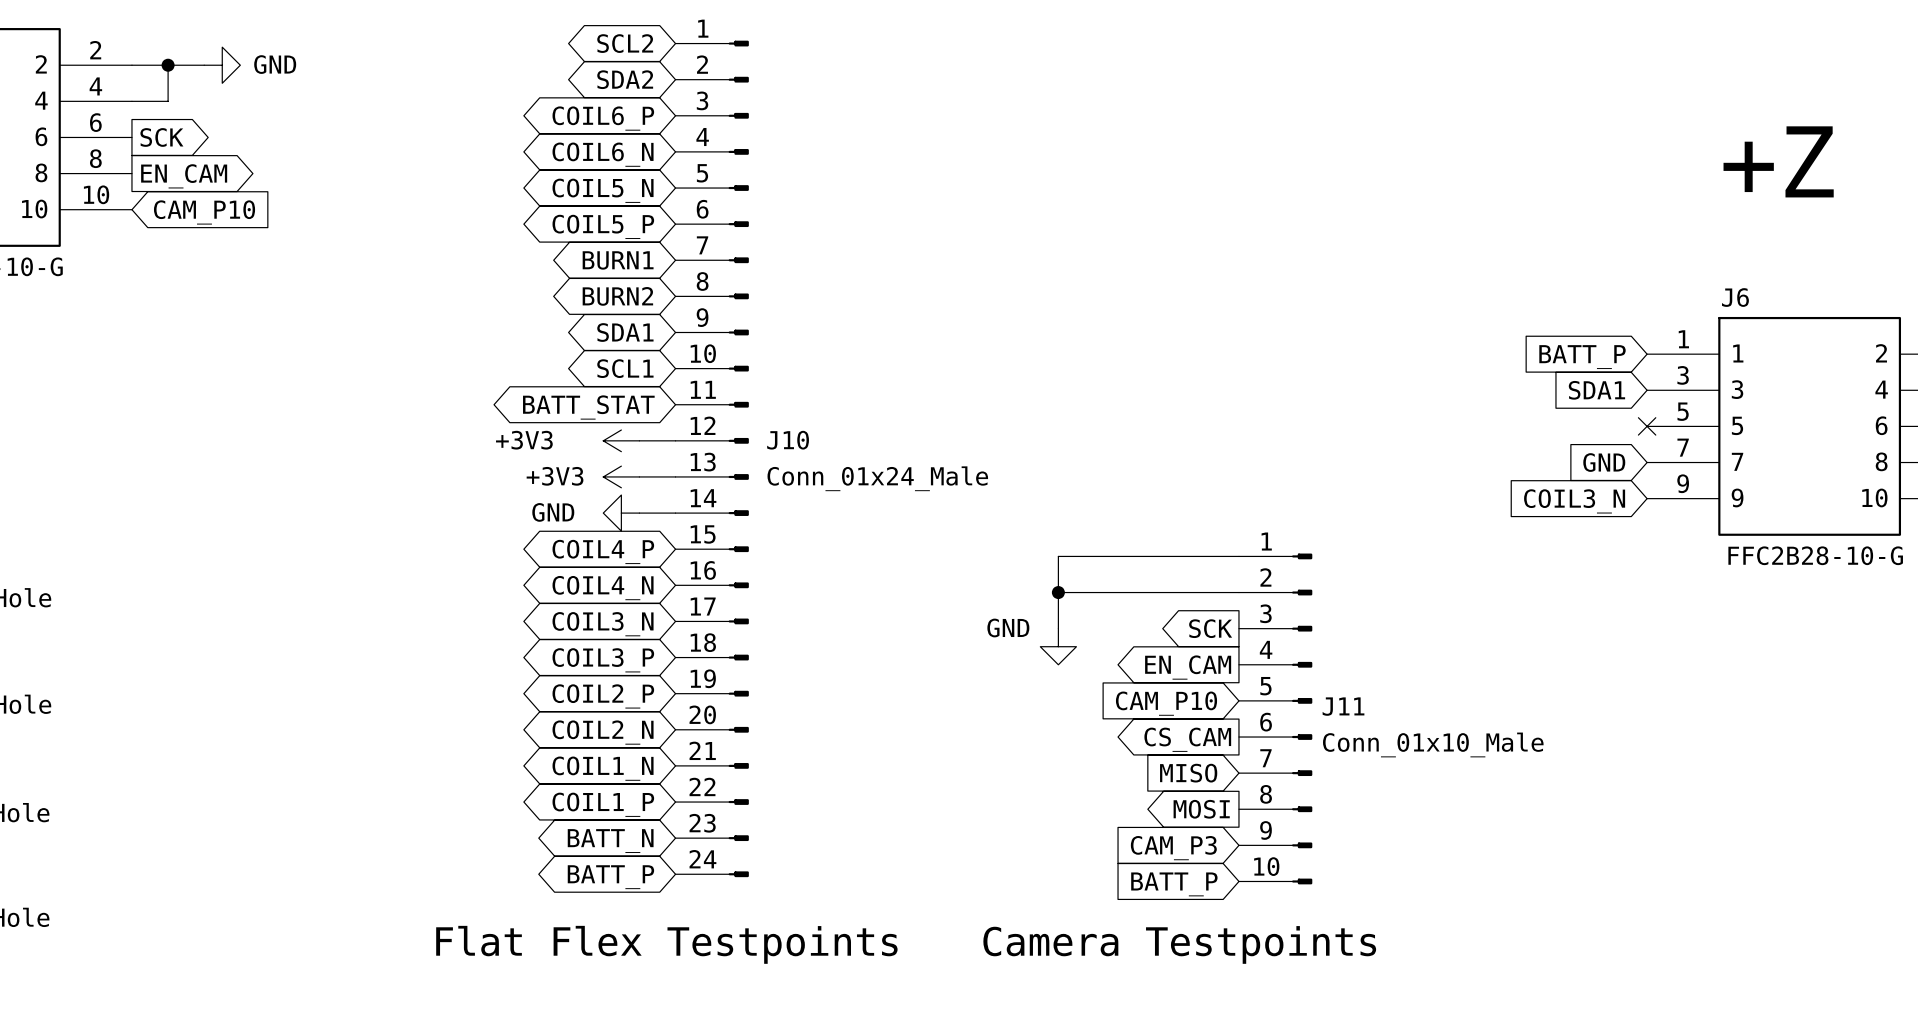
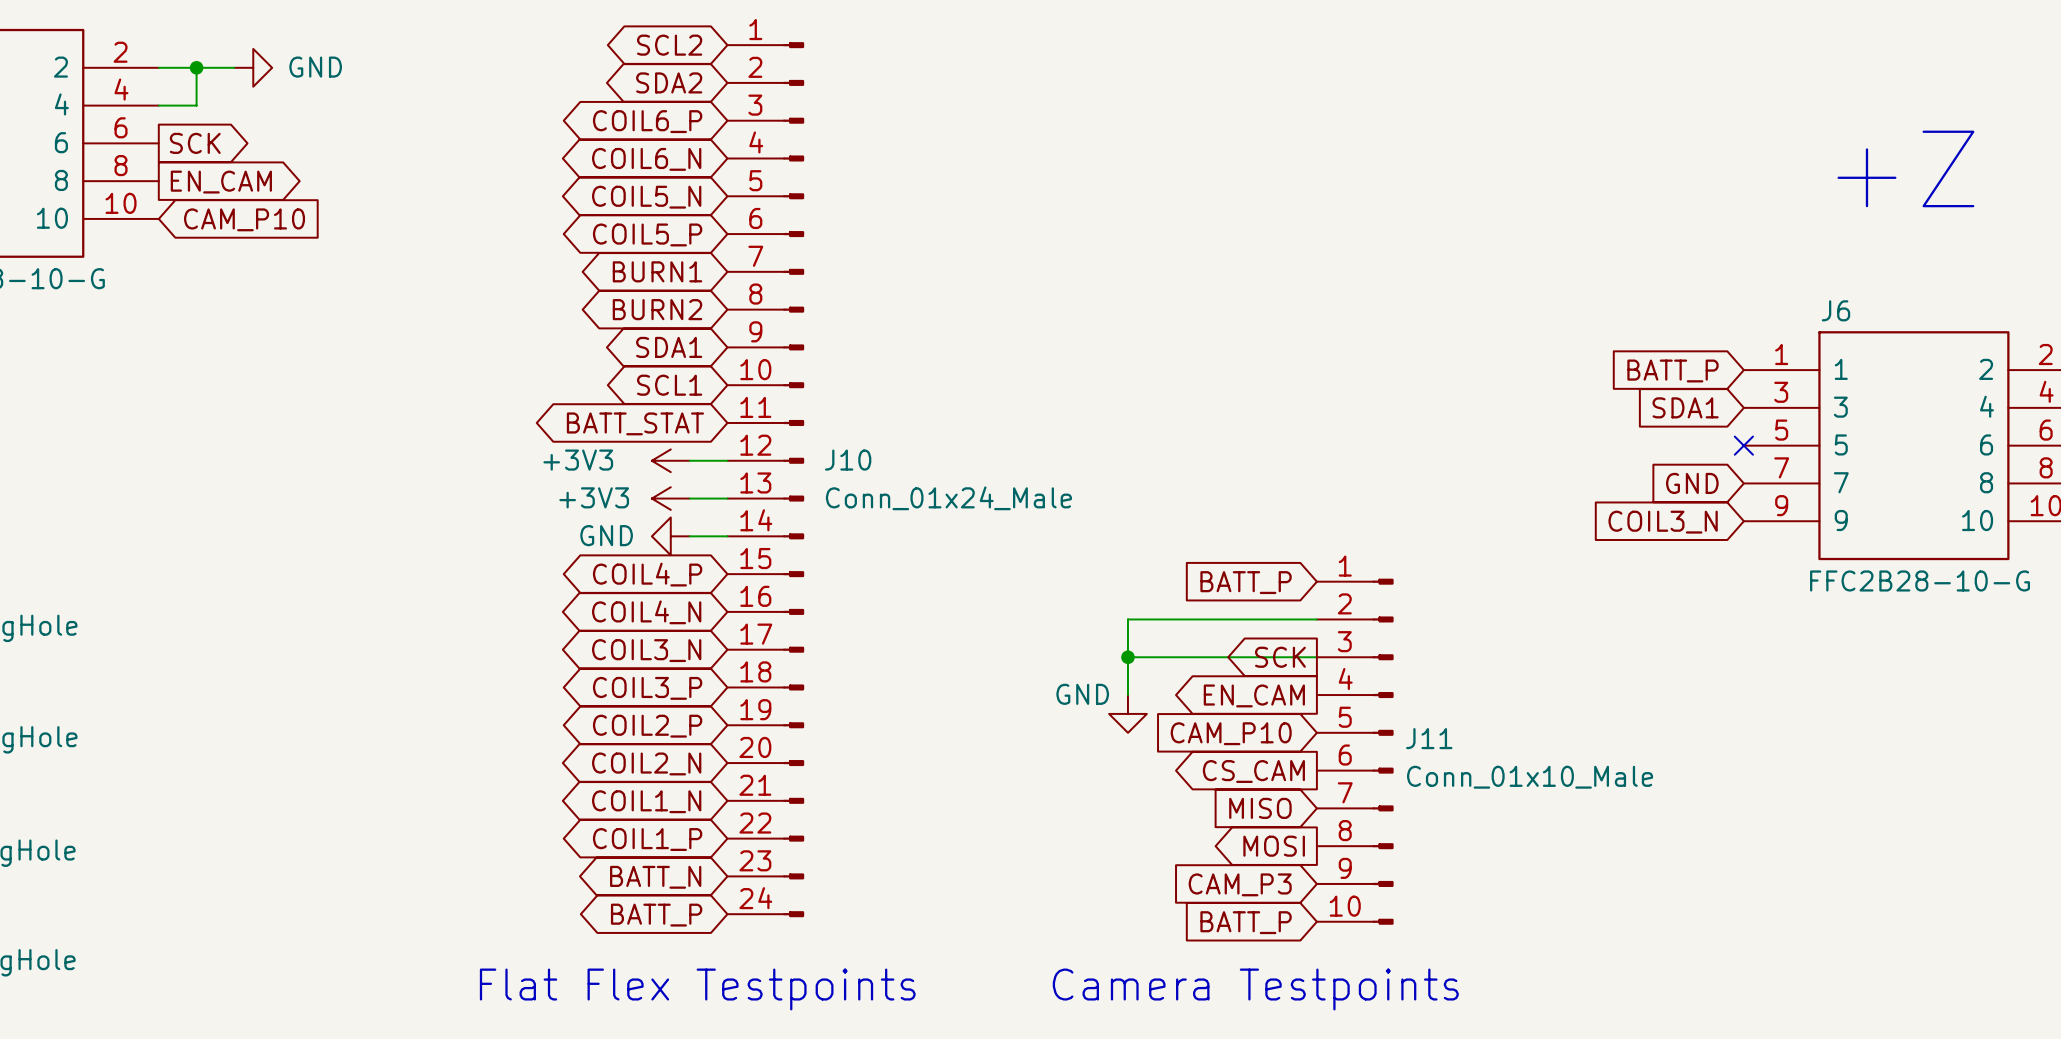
wire: (1238, 556) (1058, 556) (1058, 592) -> (1316, 657) (1127, 657) (1127, 695)
global label: none -> BATT_P (1246, 582)
junction position: (1058, 592) -> (1127, 657)
power symbol position: GND (1058, 646) -> GND (1127, 713)

